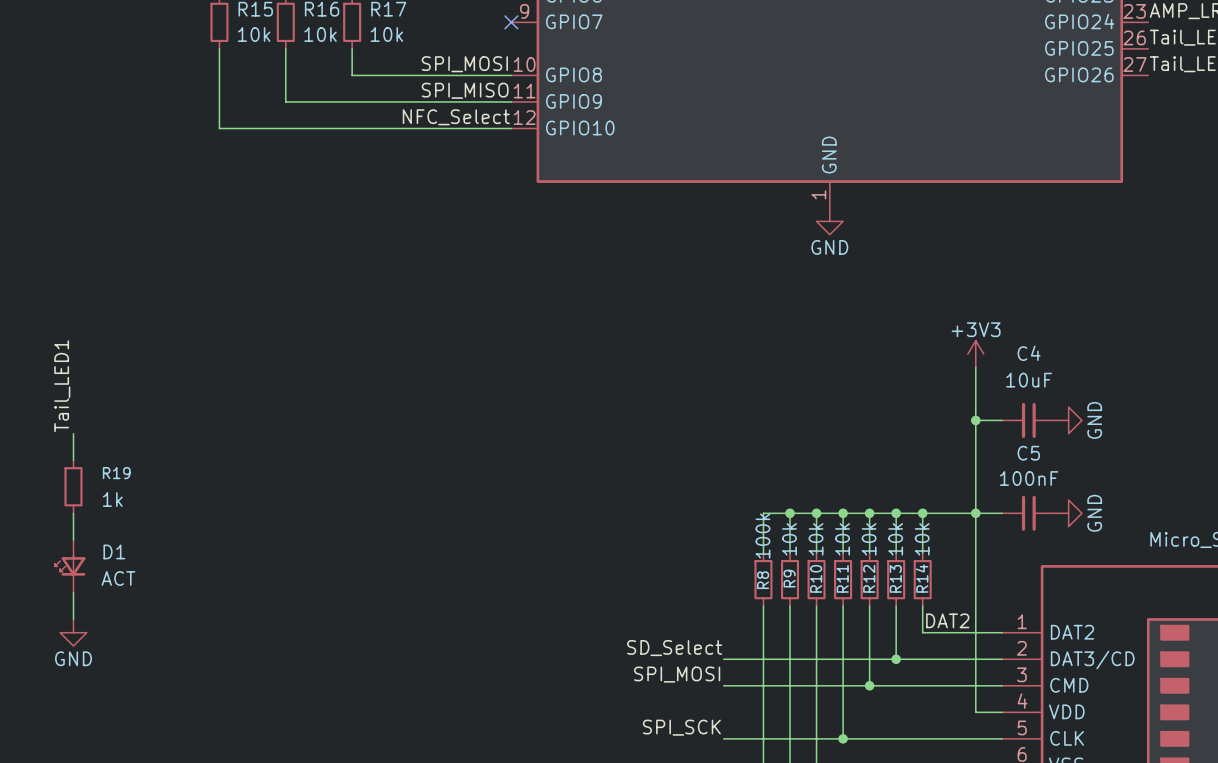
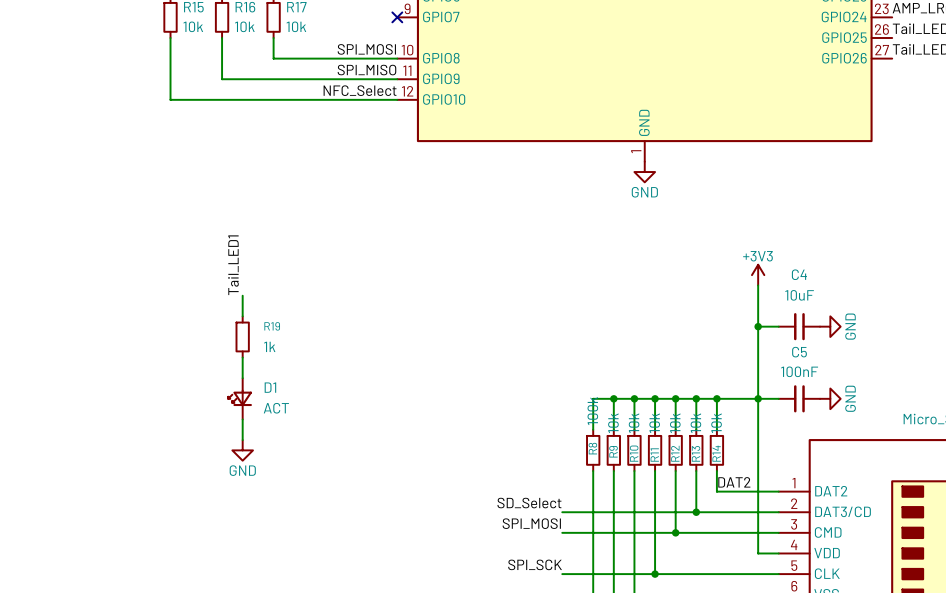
wire: none -> (242, 295) (242, 316)
label position: Tail_LED1 (62, 386) -> Tail_LED1 (233, 265)
wire: (73, 433) (73, 460) -> (242, 357) (242, 378)
R19 position: (73, 486) -> (242, 336)
wire: (73, 513) (73, 539) -> (242, 419) (242, 440)
D1 position: (70, 566) -> (240, 398)
wire: (73, 592) (73, 619) -> none
power symbol position: GND (73, 632) -> GND (242, 450)

